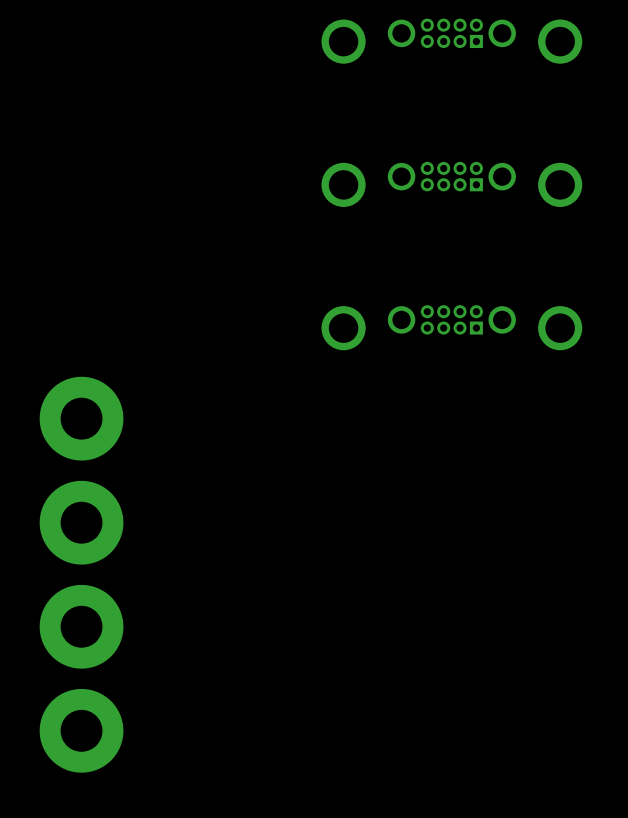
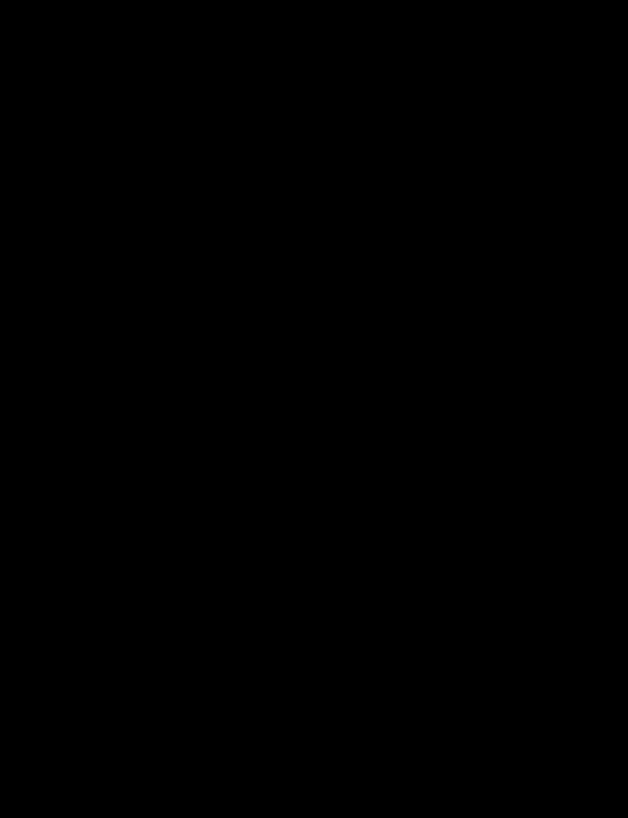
part: (451, 41) -> none
part: (451, 184) -> none
part: (451, 327) -> none
part: (81, 418) -> none
part: (81, 522) -> none
part: (81, 626) -> none
part: (81, 730) -> none

